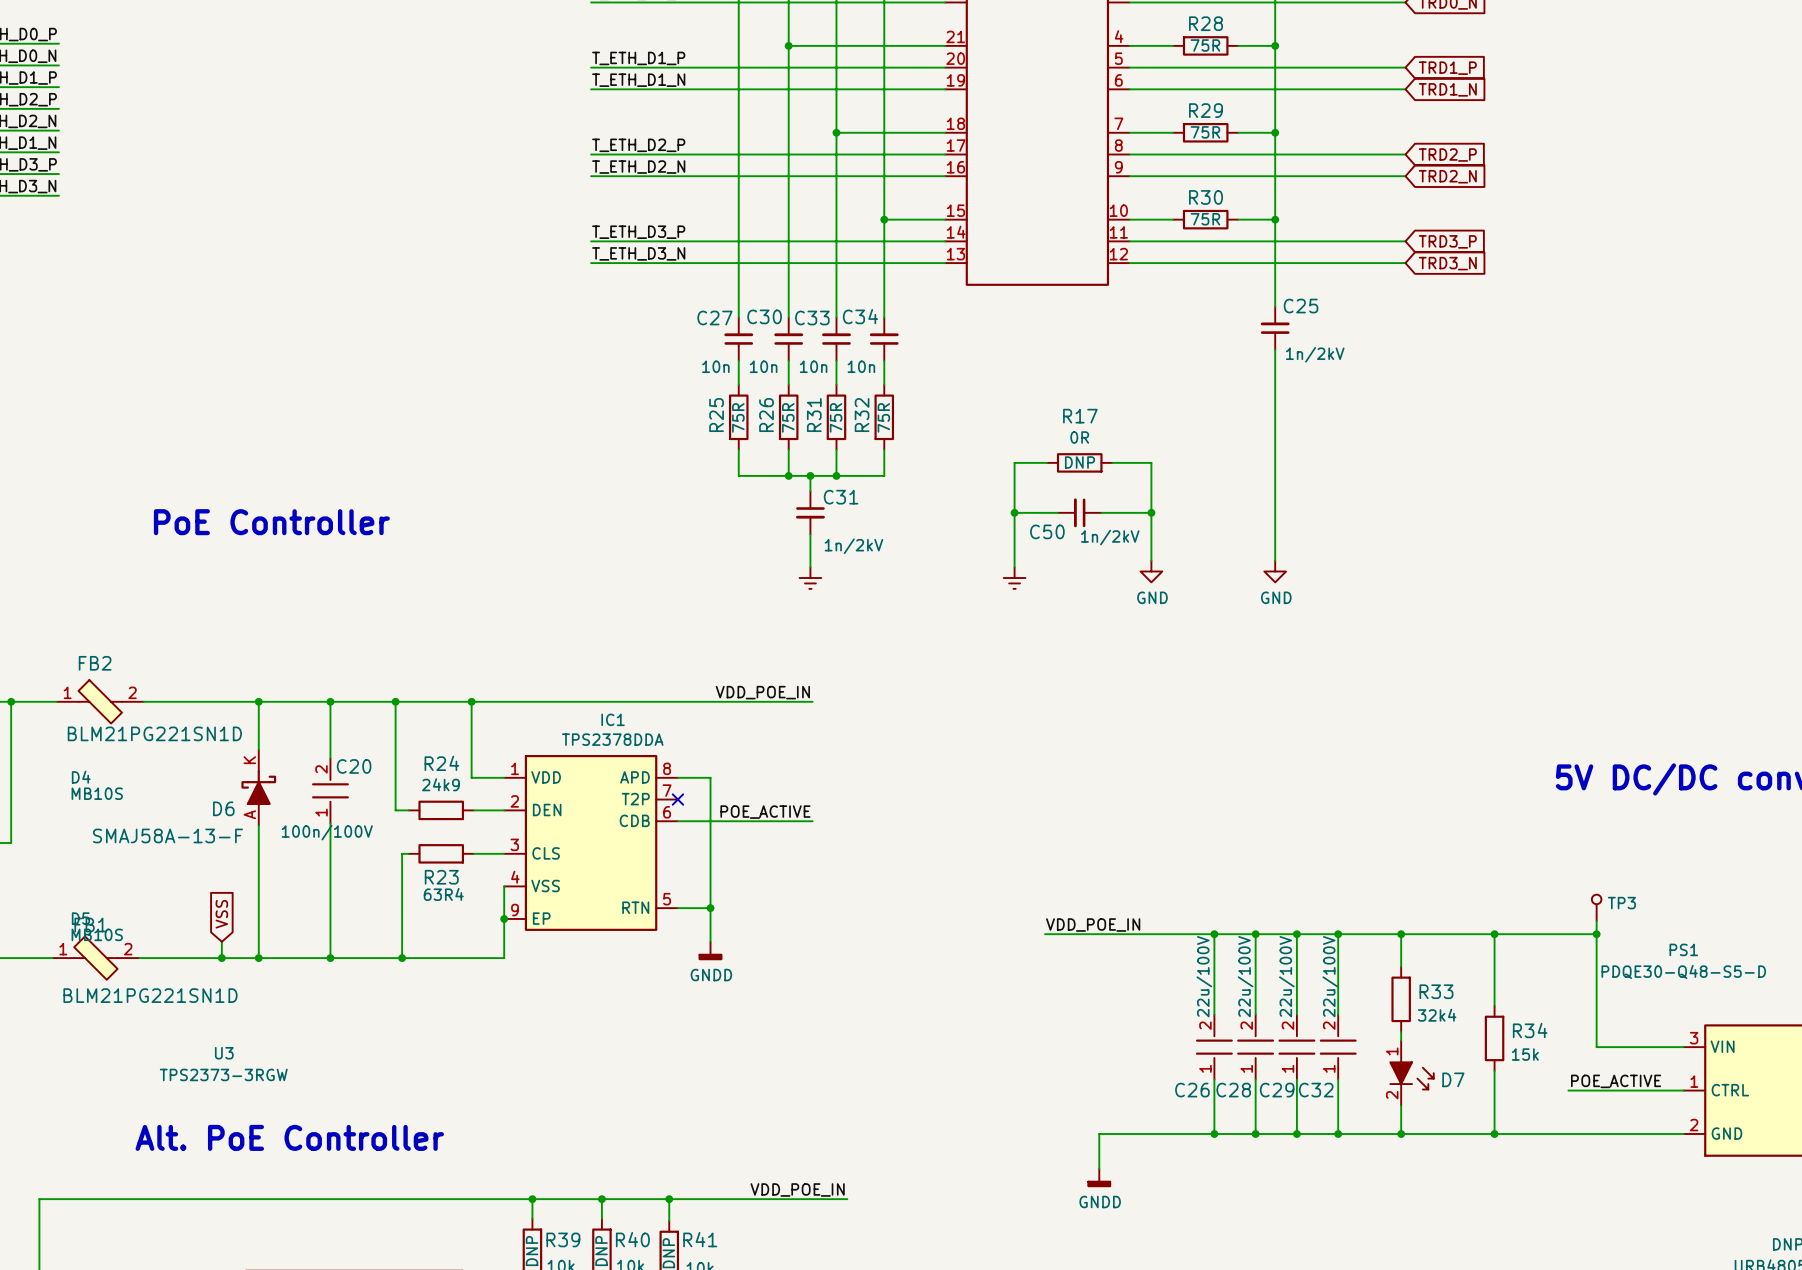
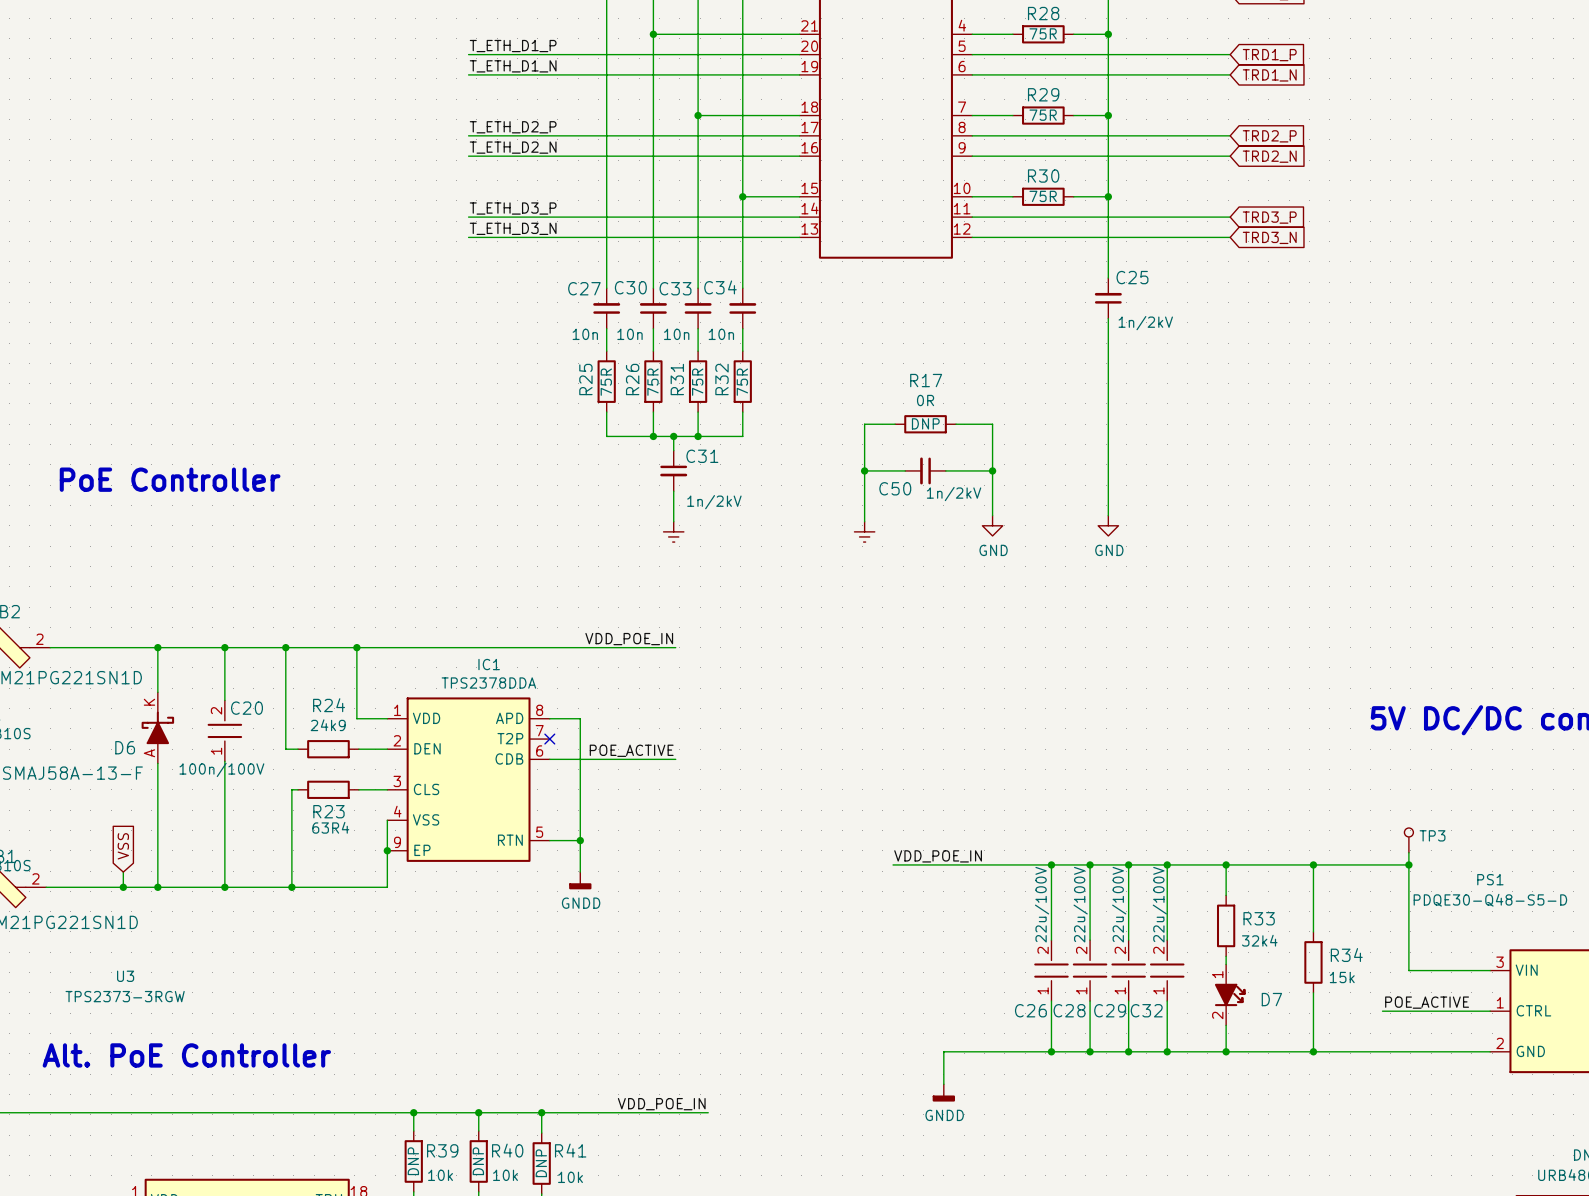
D7 symbol: [1390, 1040, 1434, 1106] -> [1214, 964, 1246, 1026]

